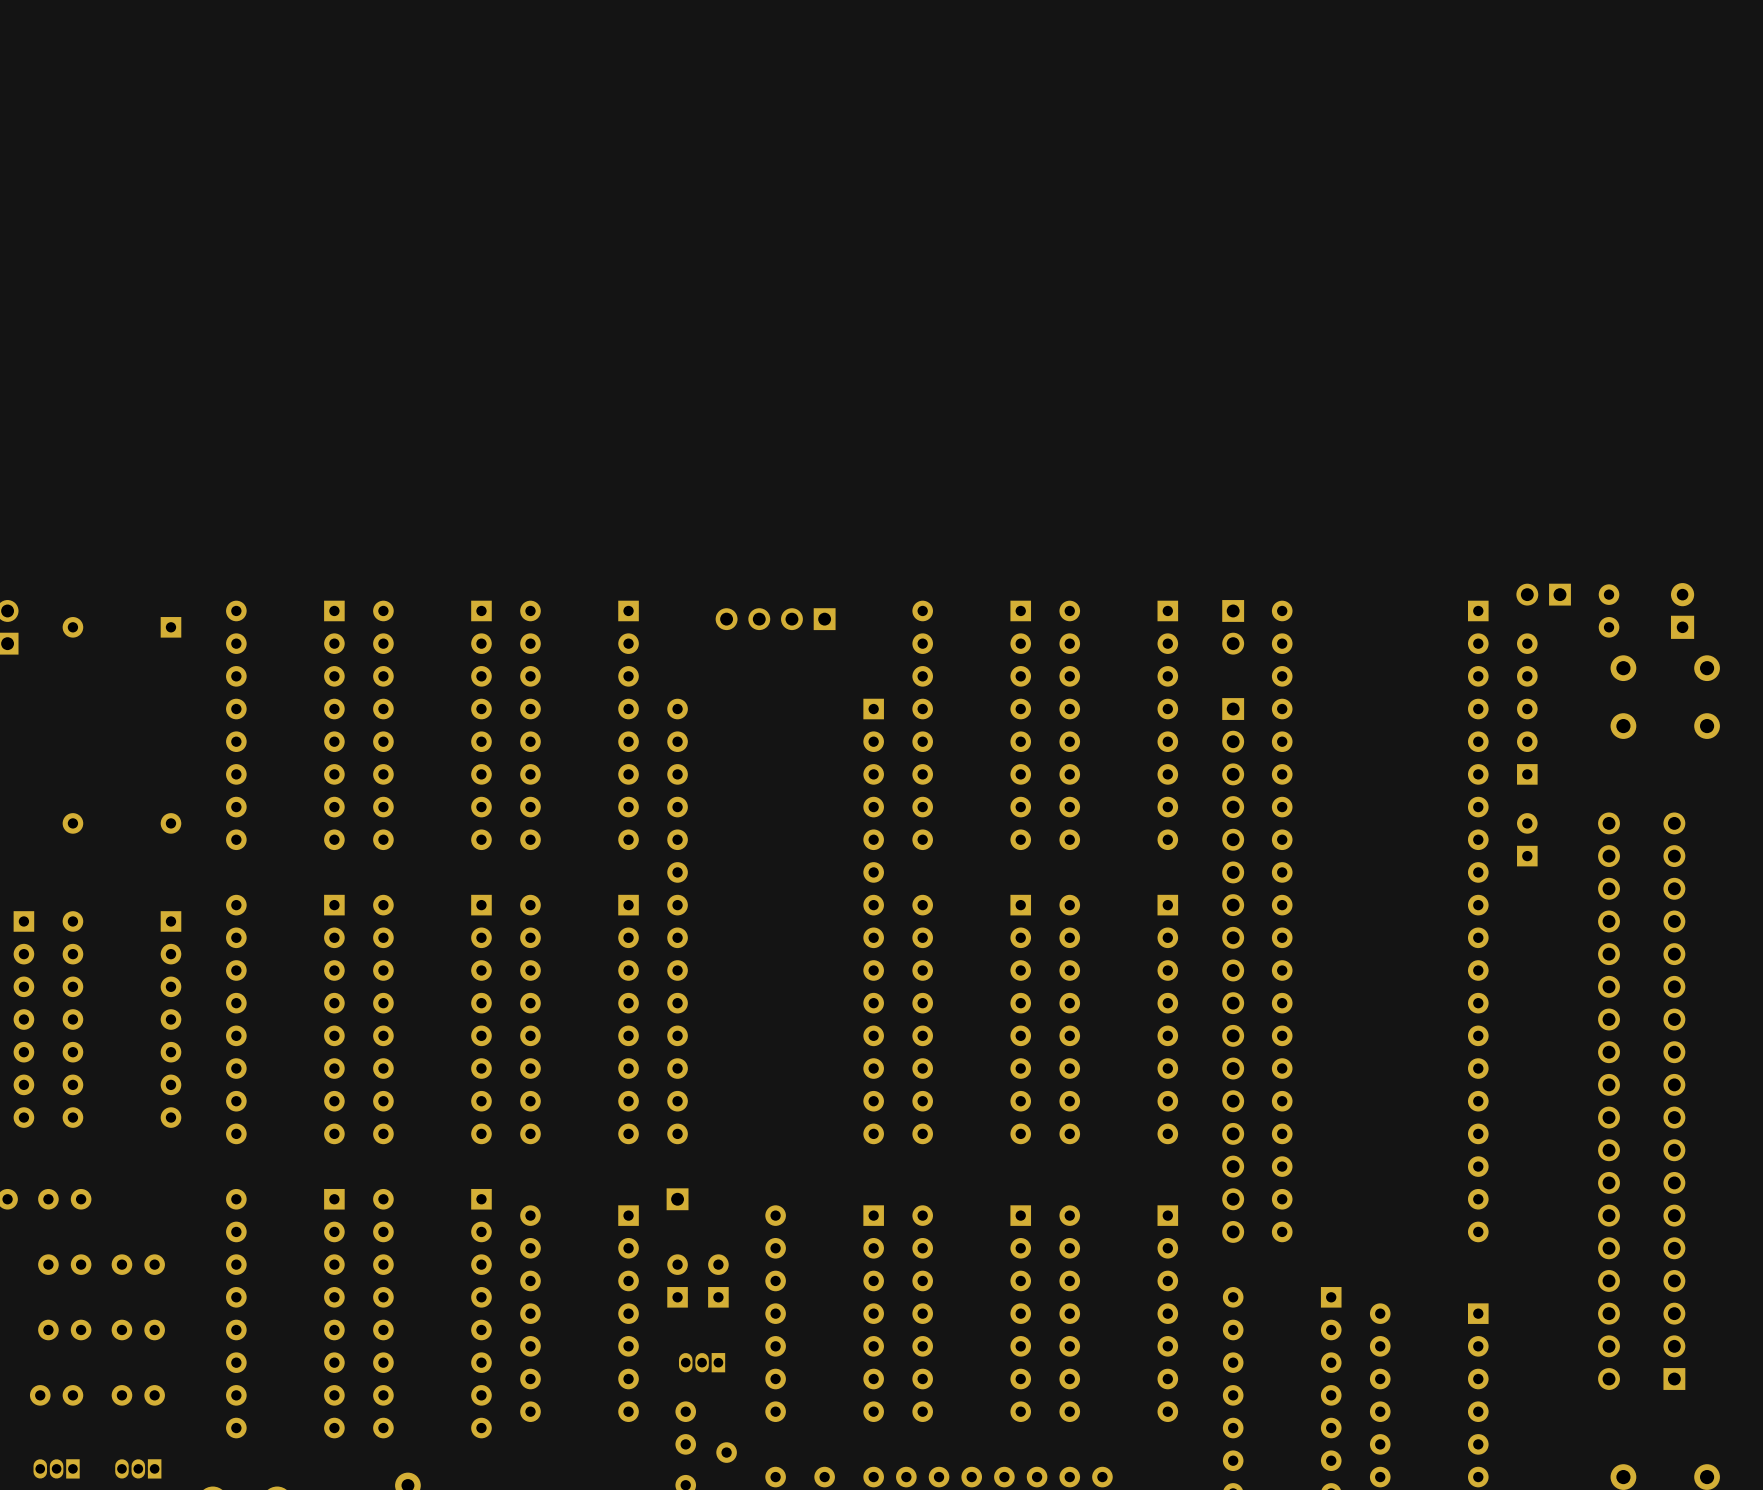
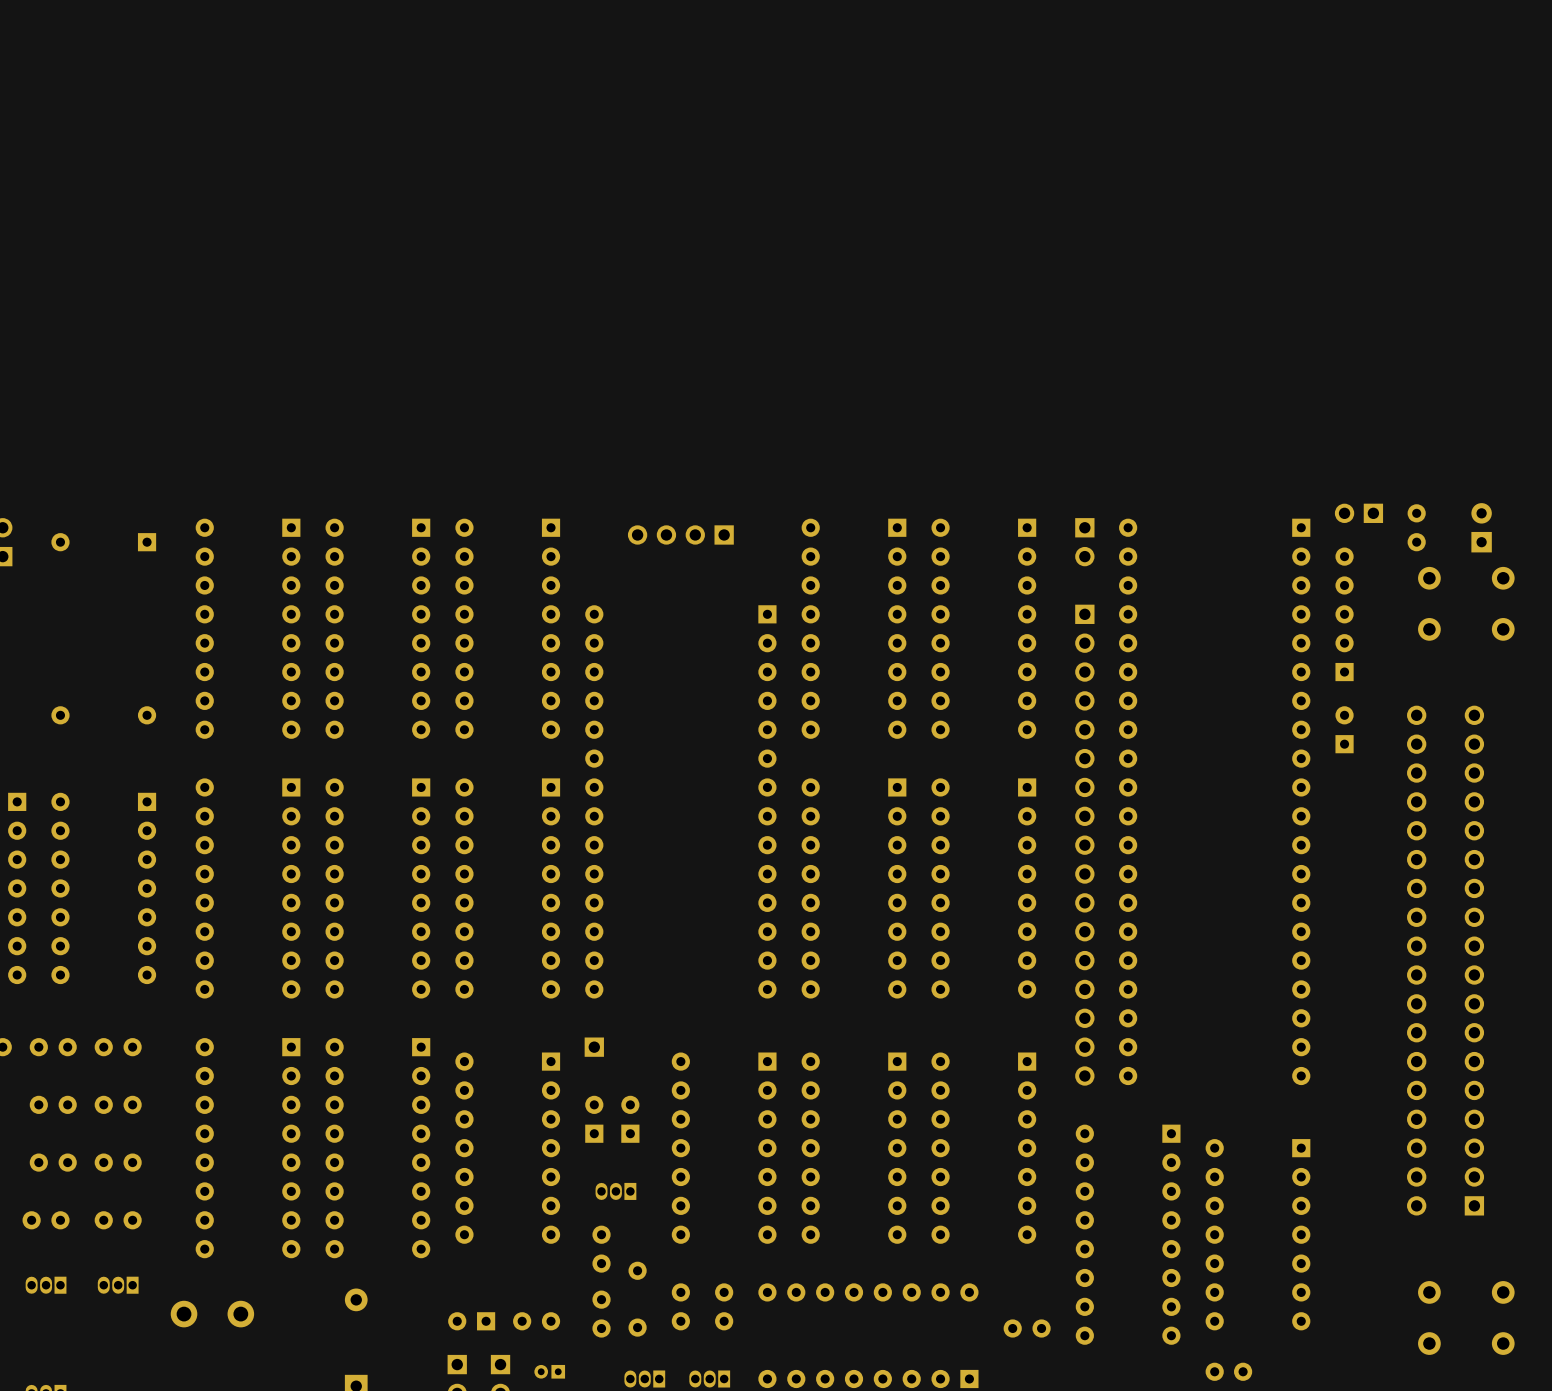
part: none -> (118, 1047)

